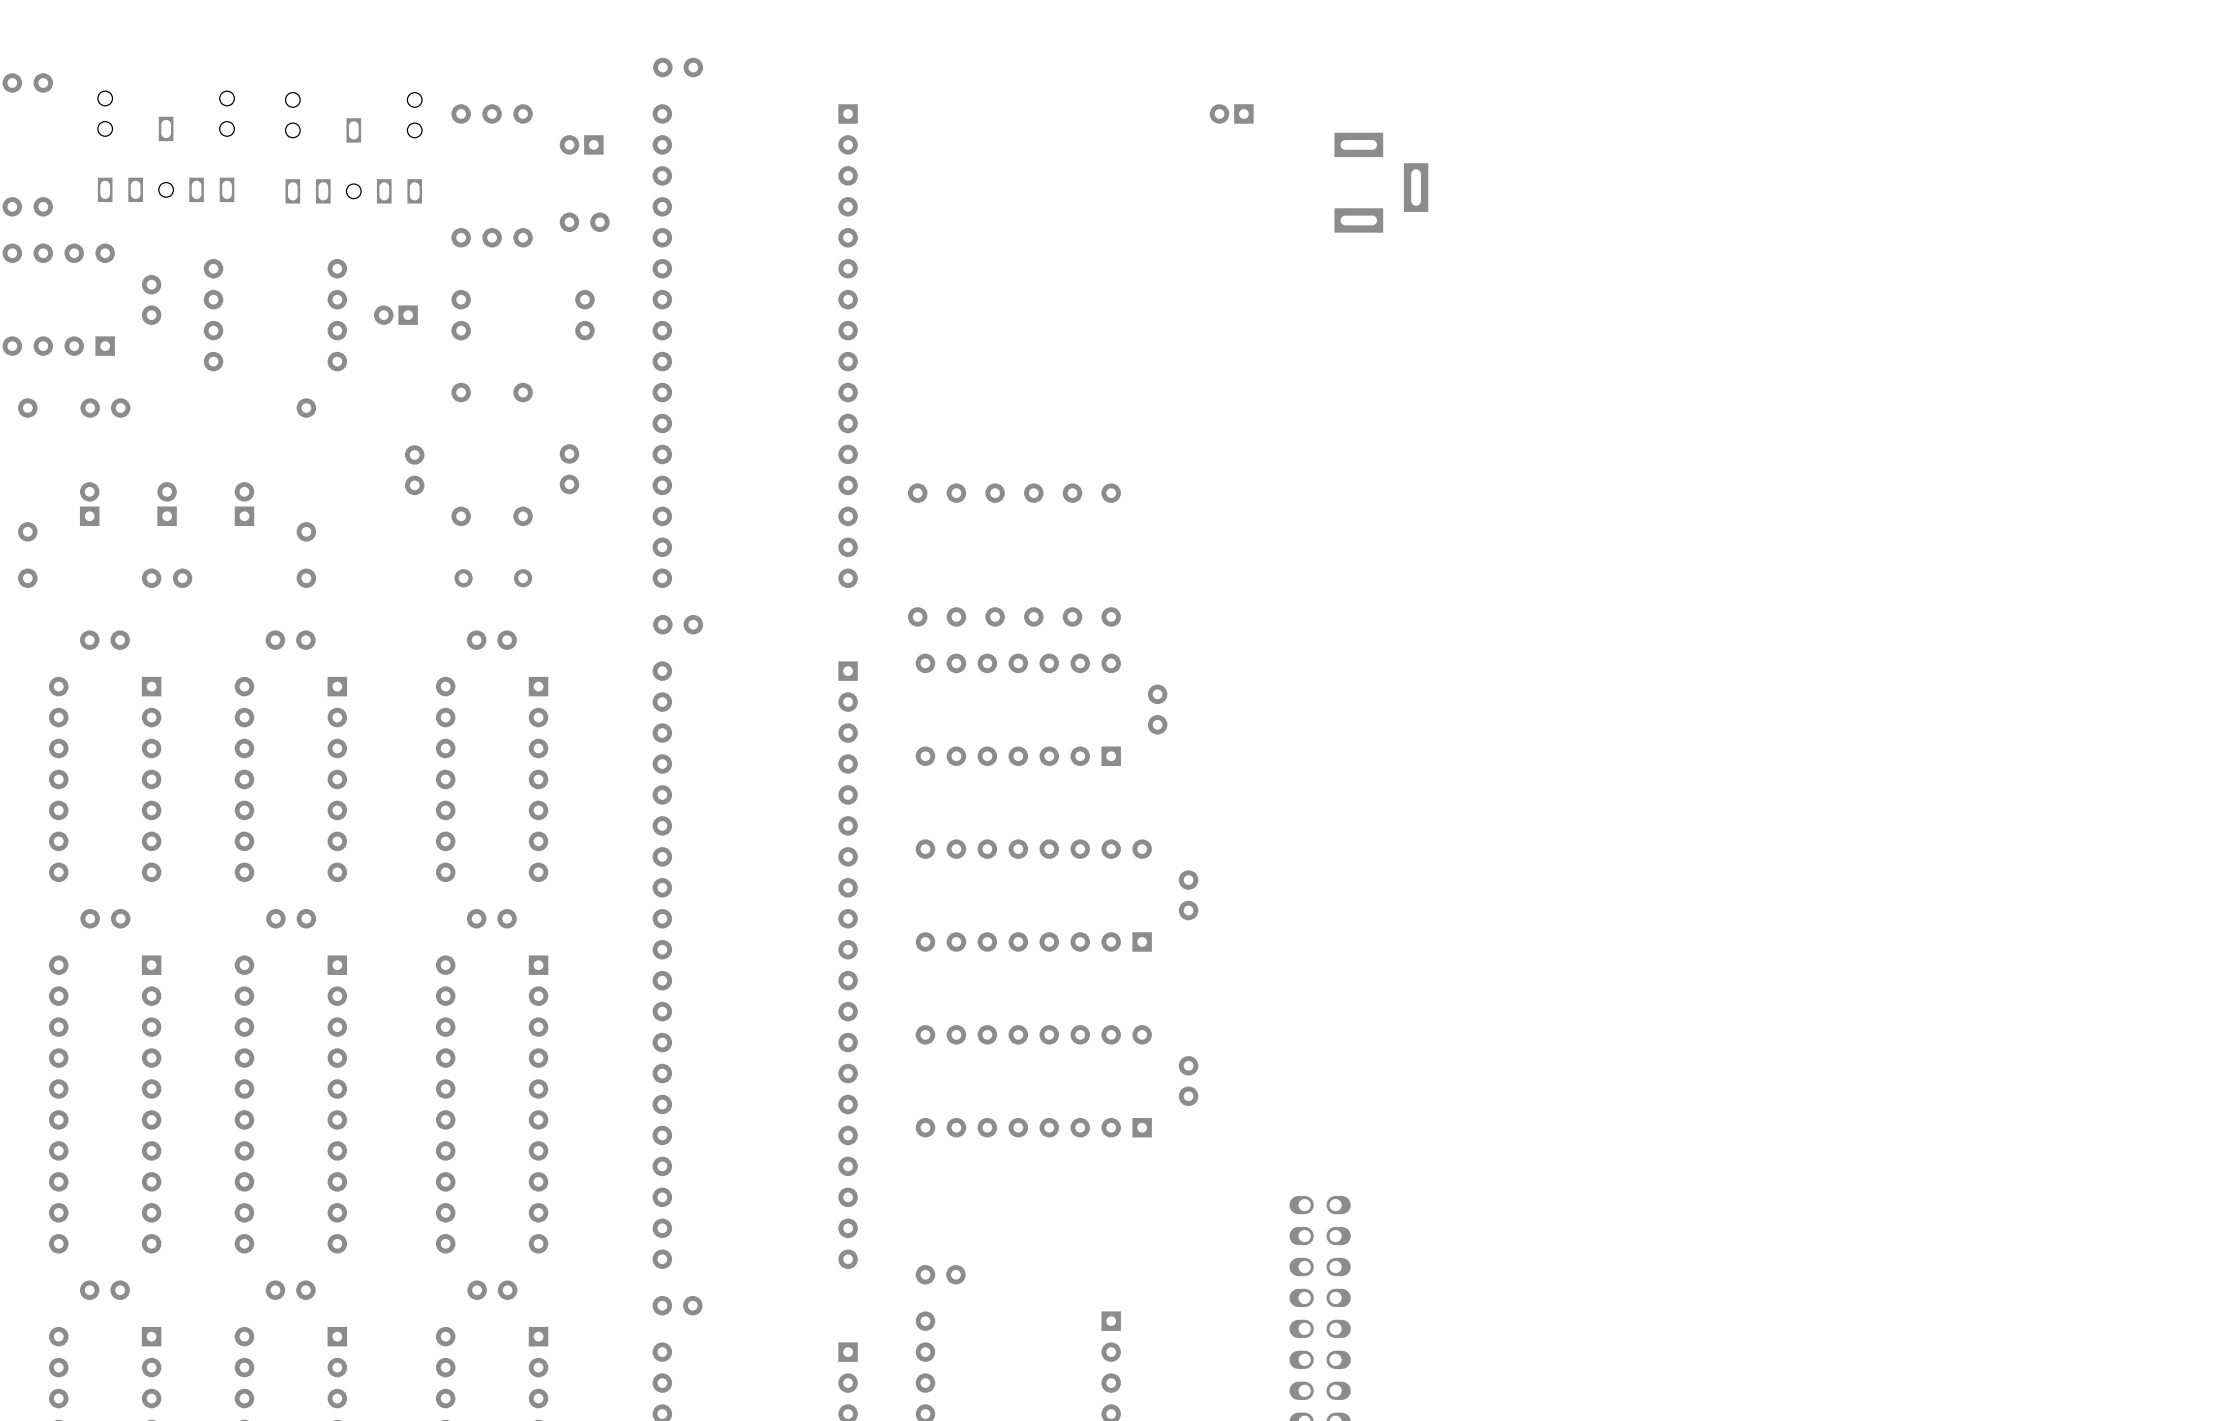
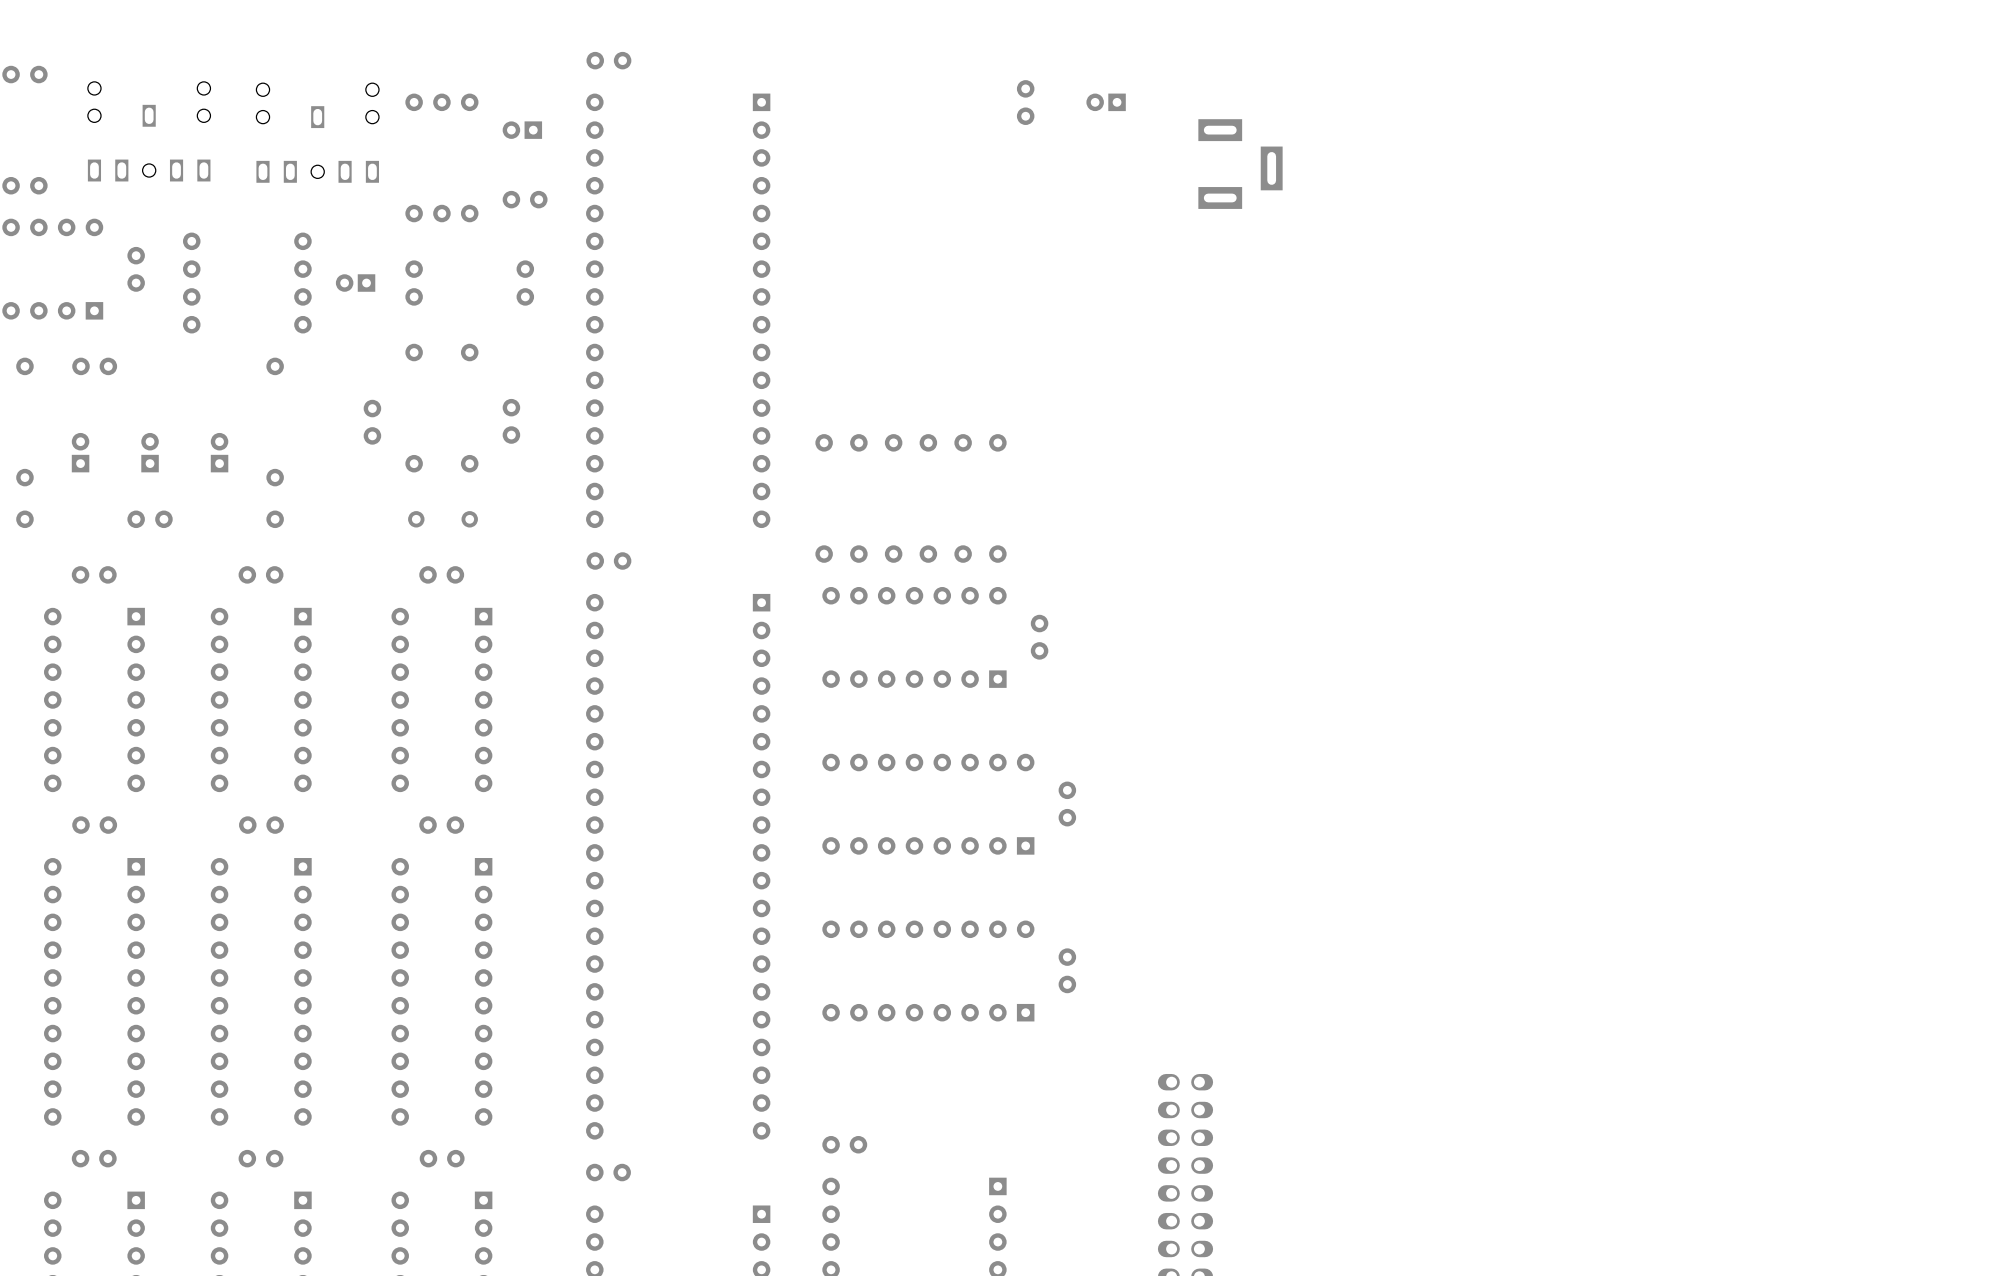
part: none -> (1025, 102)

